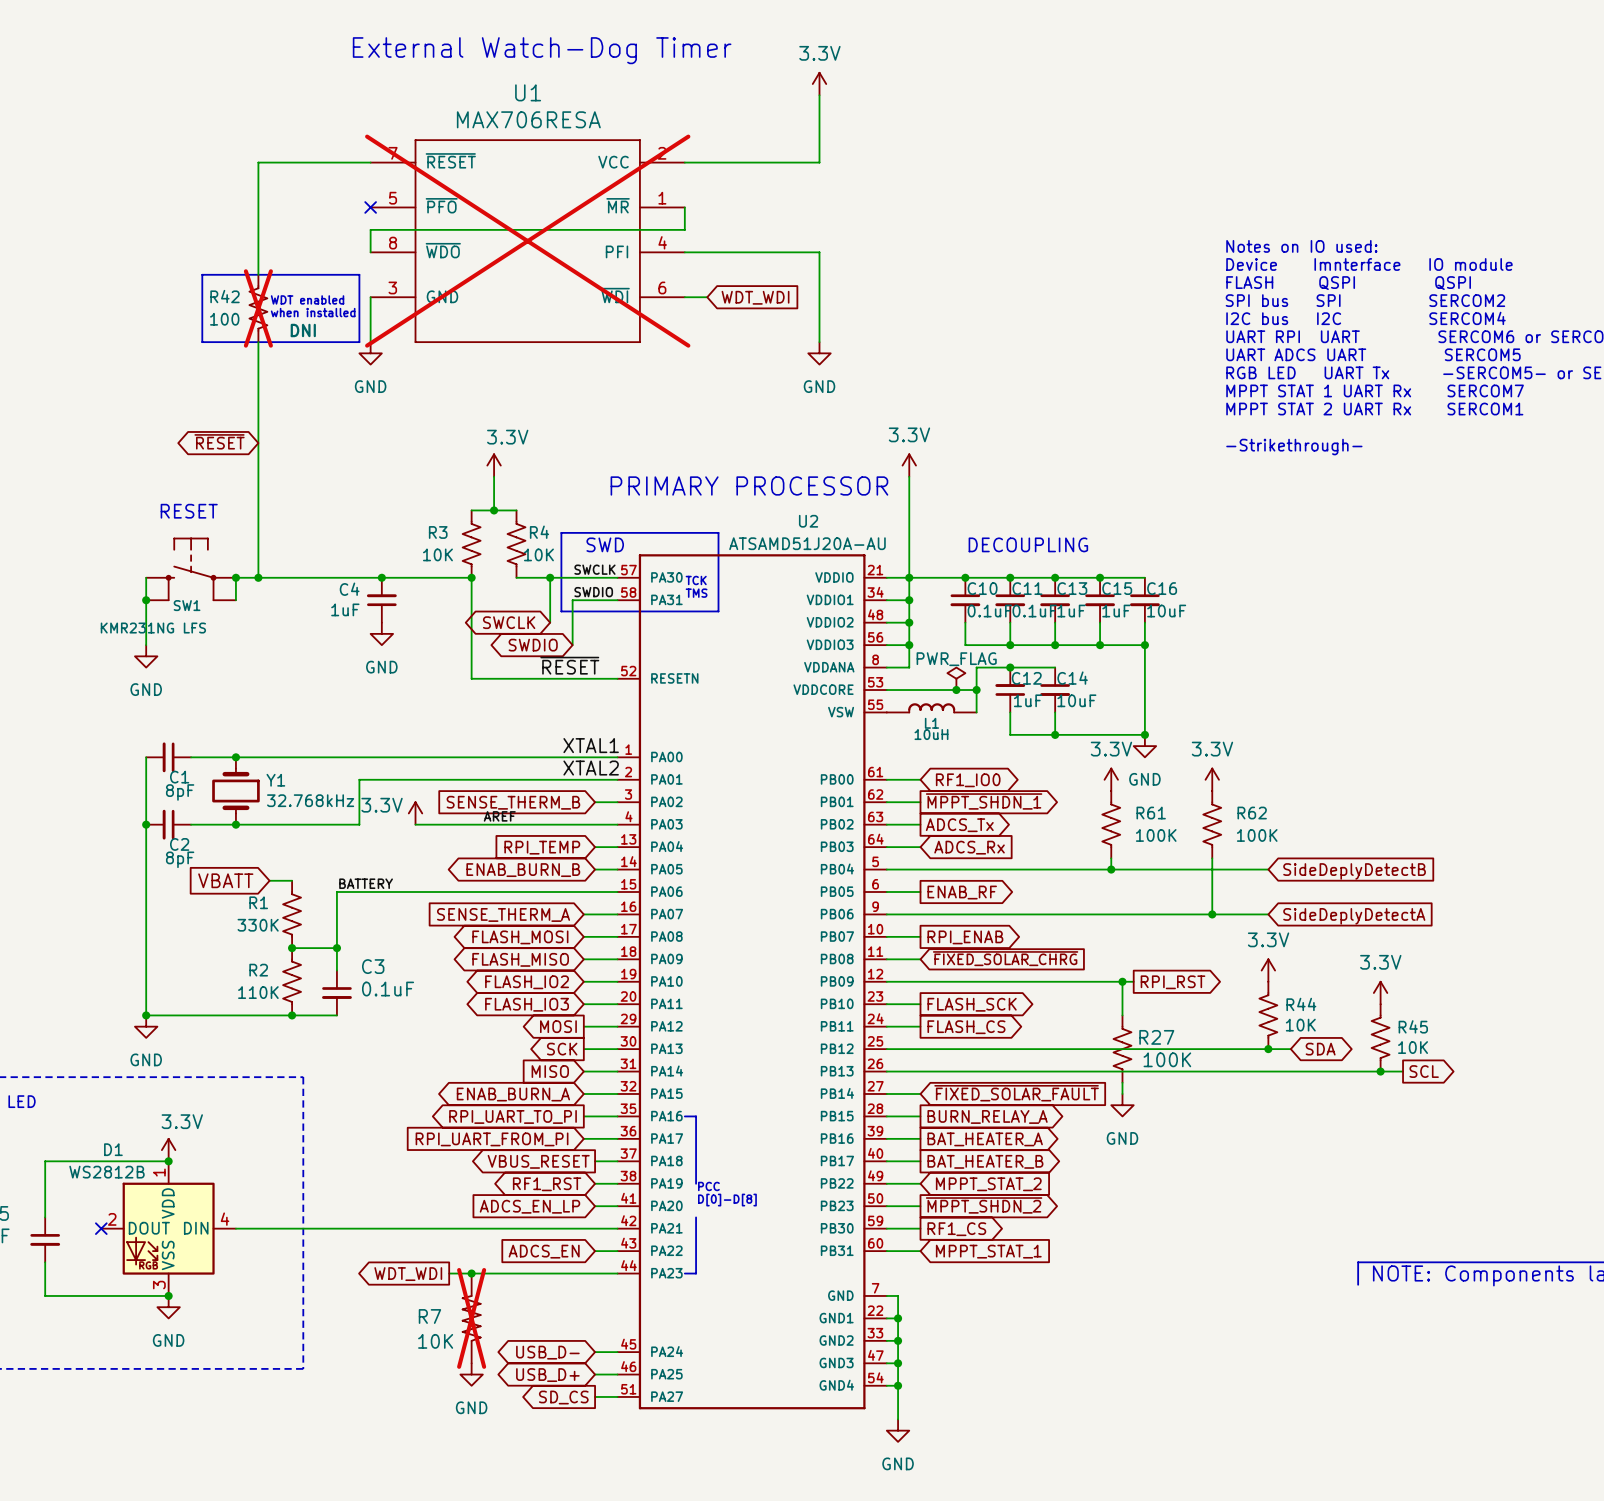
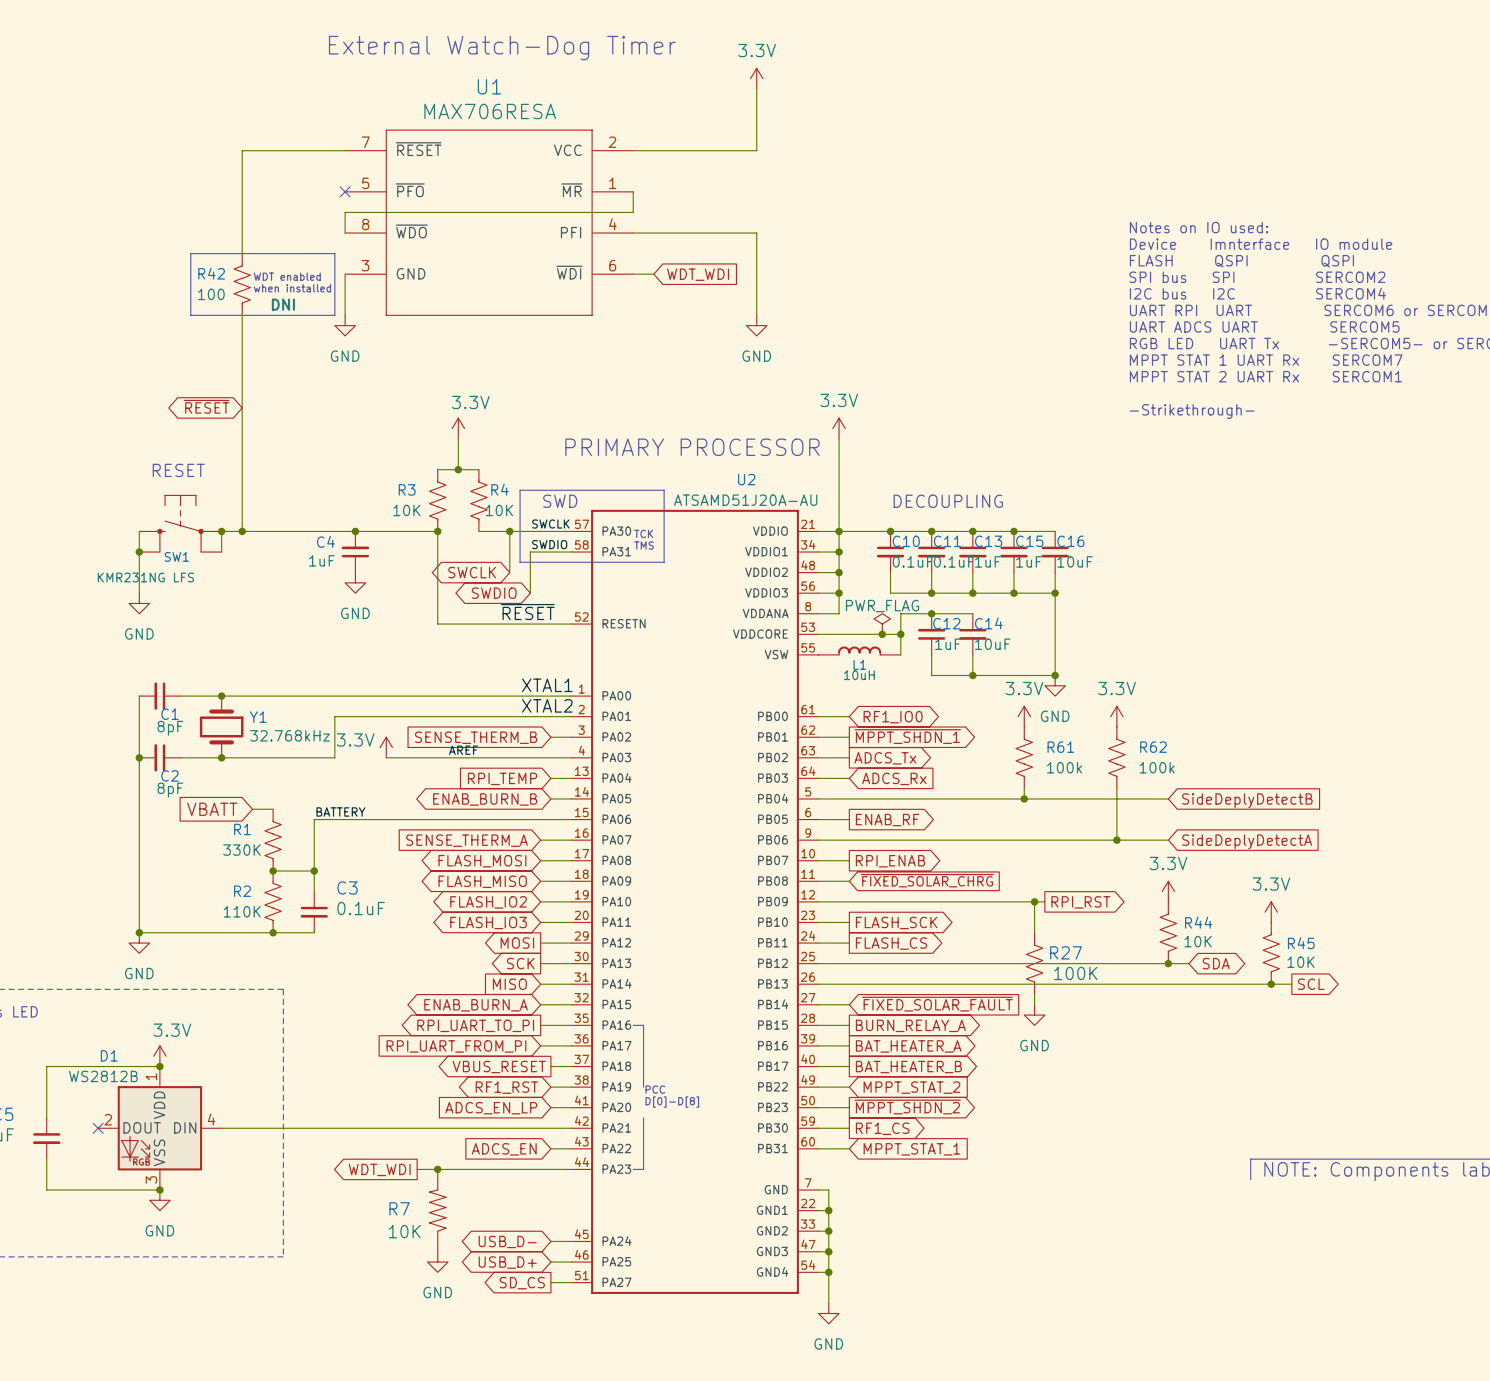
U1 do-not-place cross: (527, 241) -> none
R42 do-not-place cross: (258, 308) -> none
R61 value: 100K (1156, 835) -> 100k (1064, 767)
R62 value: 100K (1257, 835) -> 100k (1157, 767)
R7 do-not-place cross: (471, 1318) -> none

